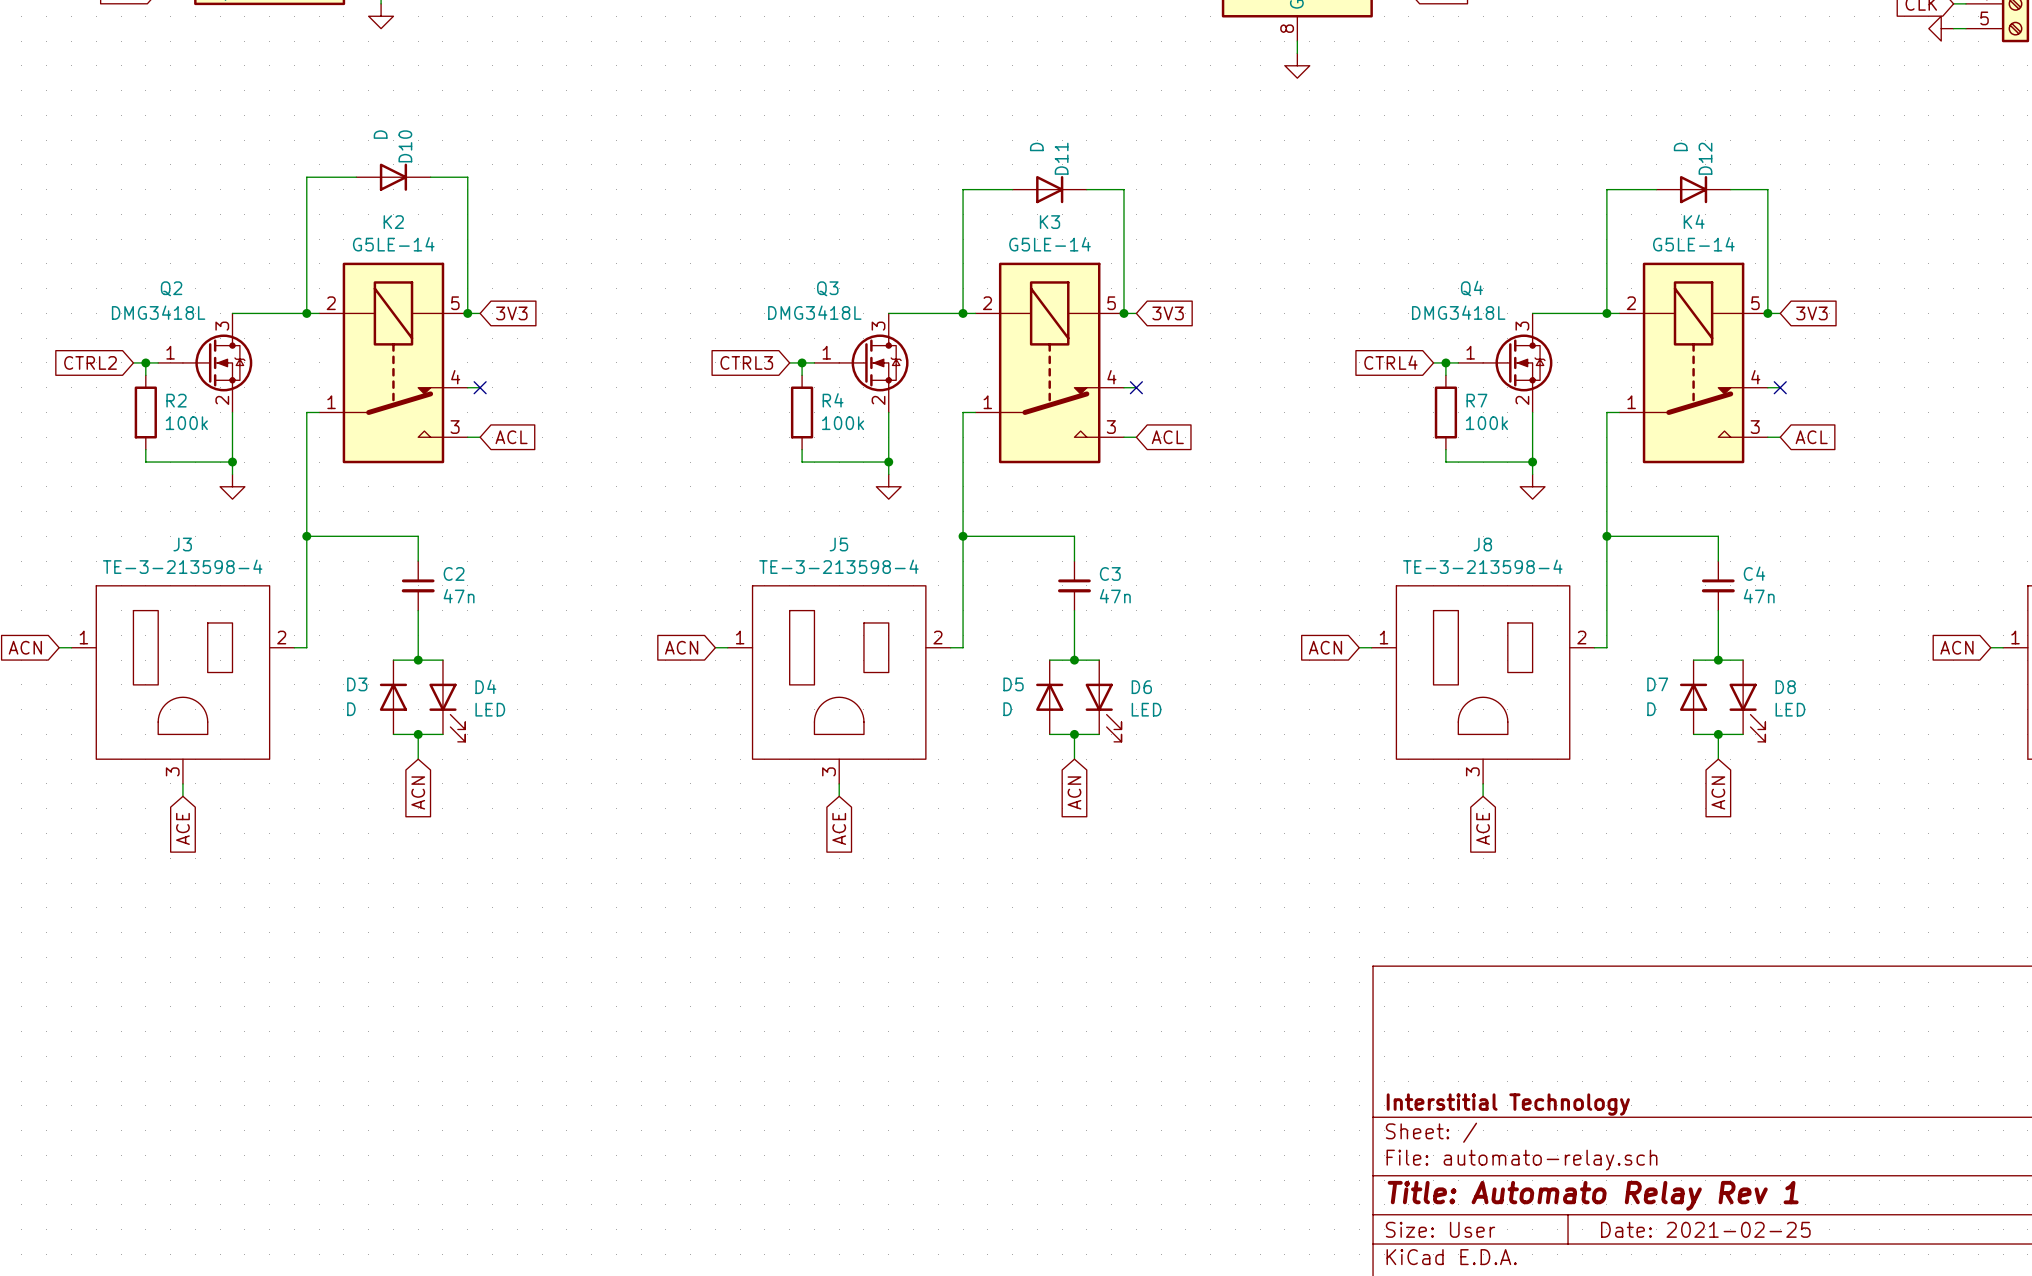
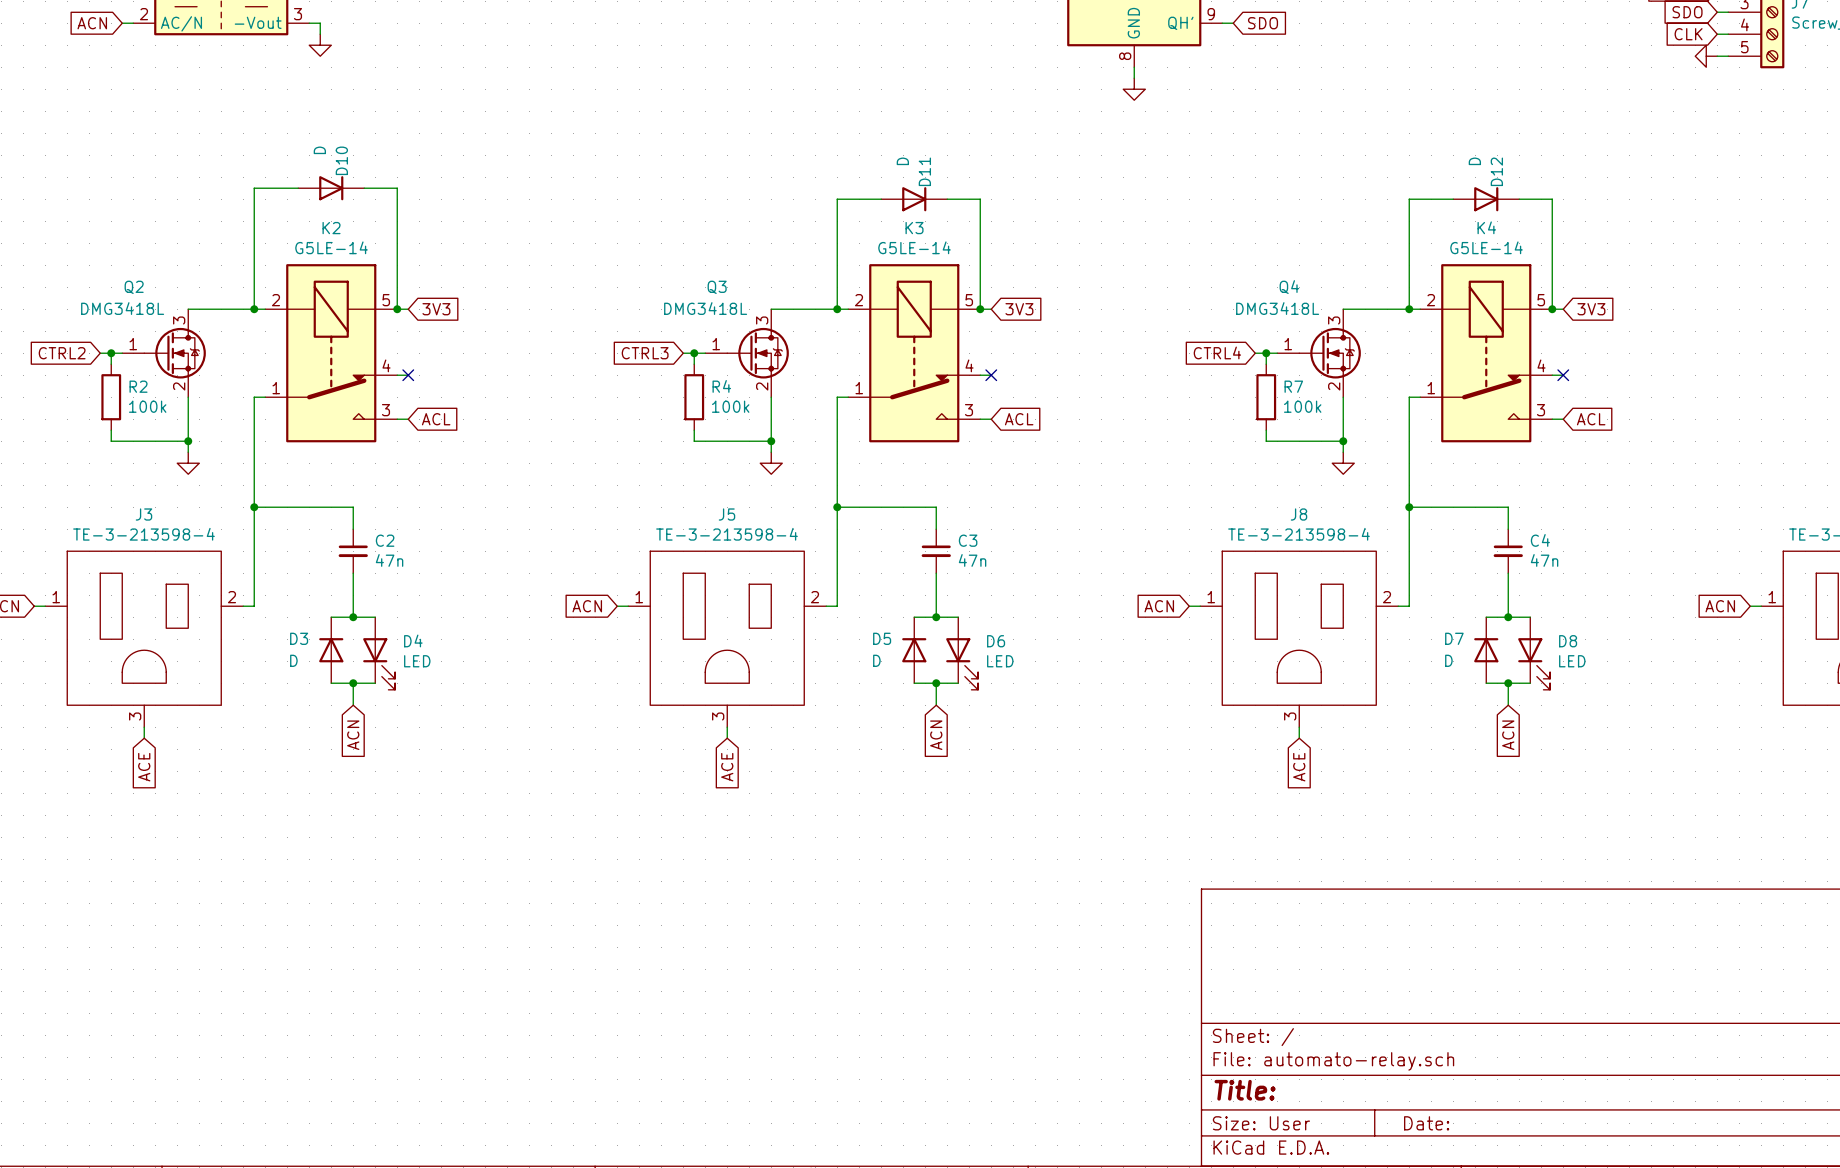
title block: Interstitial Technology (1508, 1104) -> none
title block: Title: Automato Relay Rev 1 (1593, 1195) -> Title: (1245, 1090)
title block: Date: 2021-02-25 (1705, 1229) -> Date: (1426, 1123)

